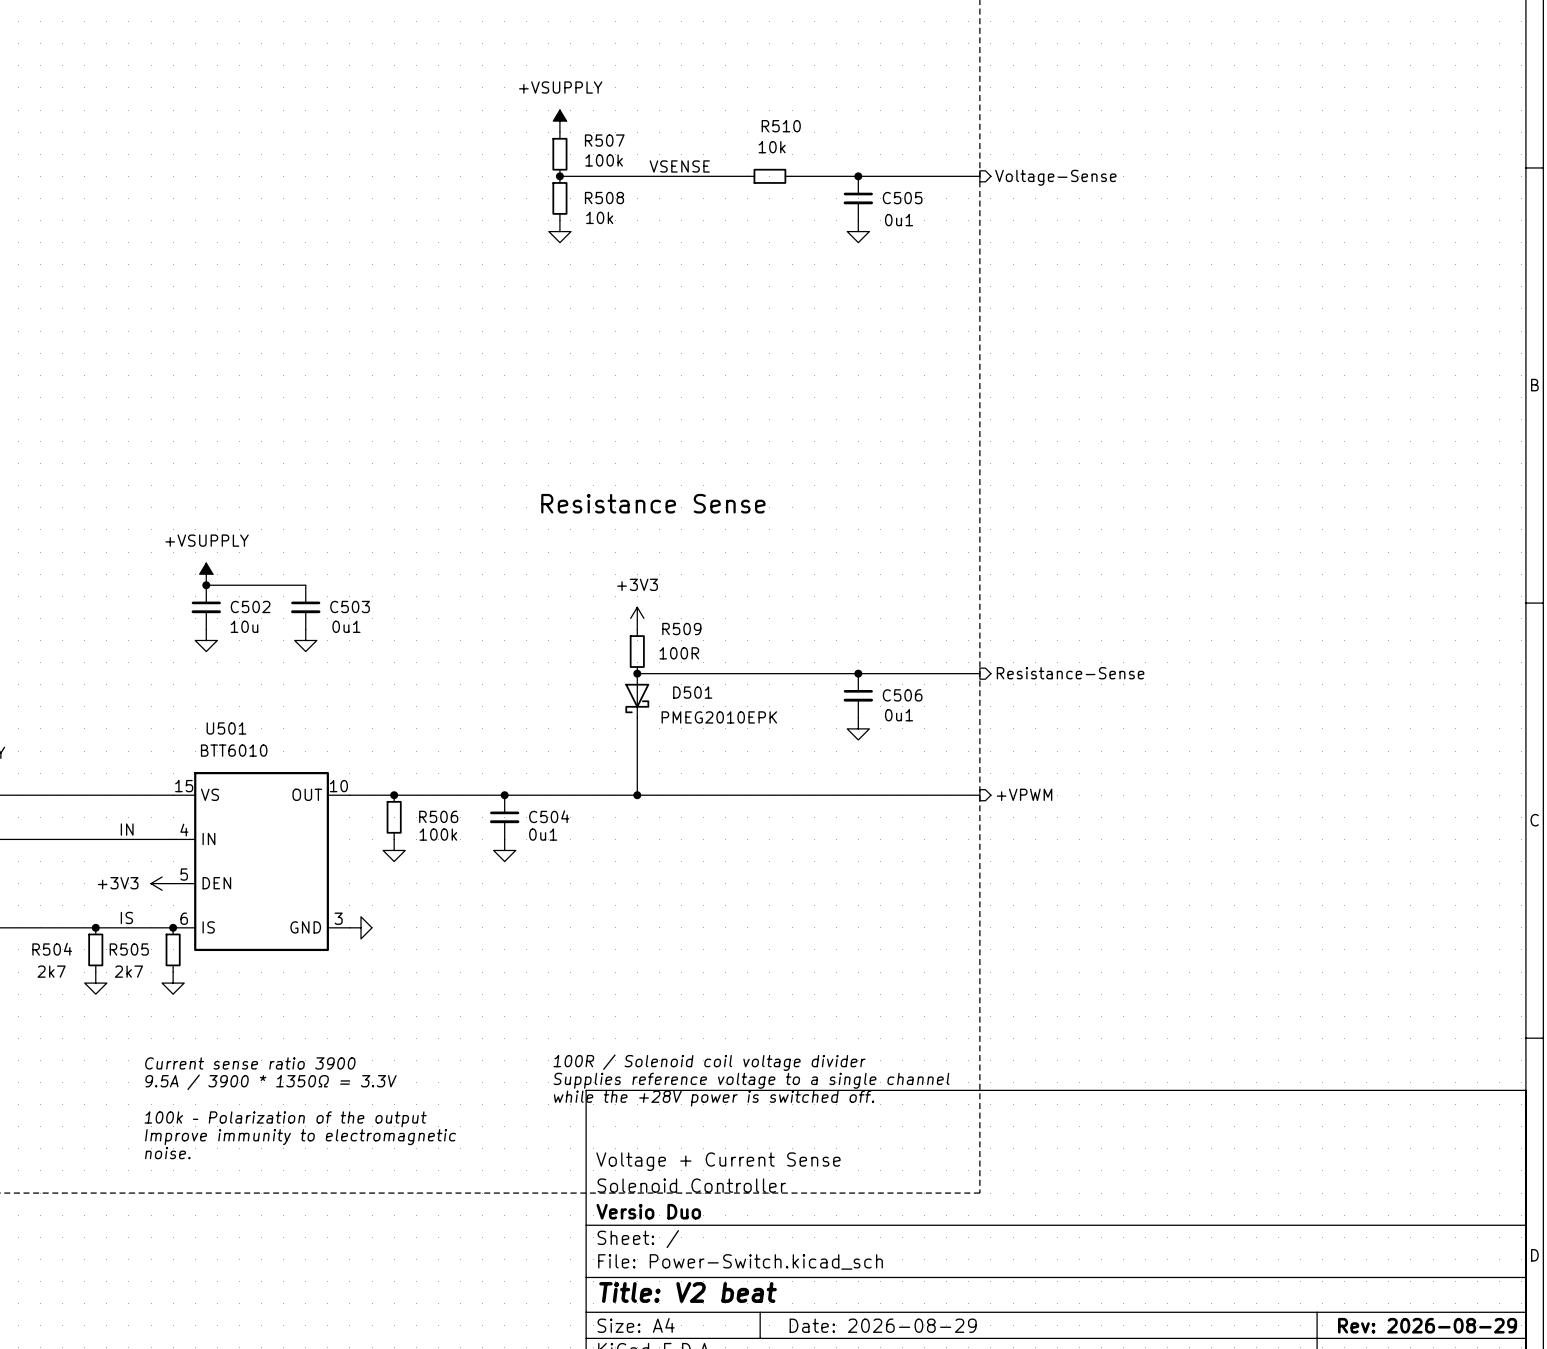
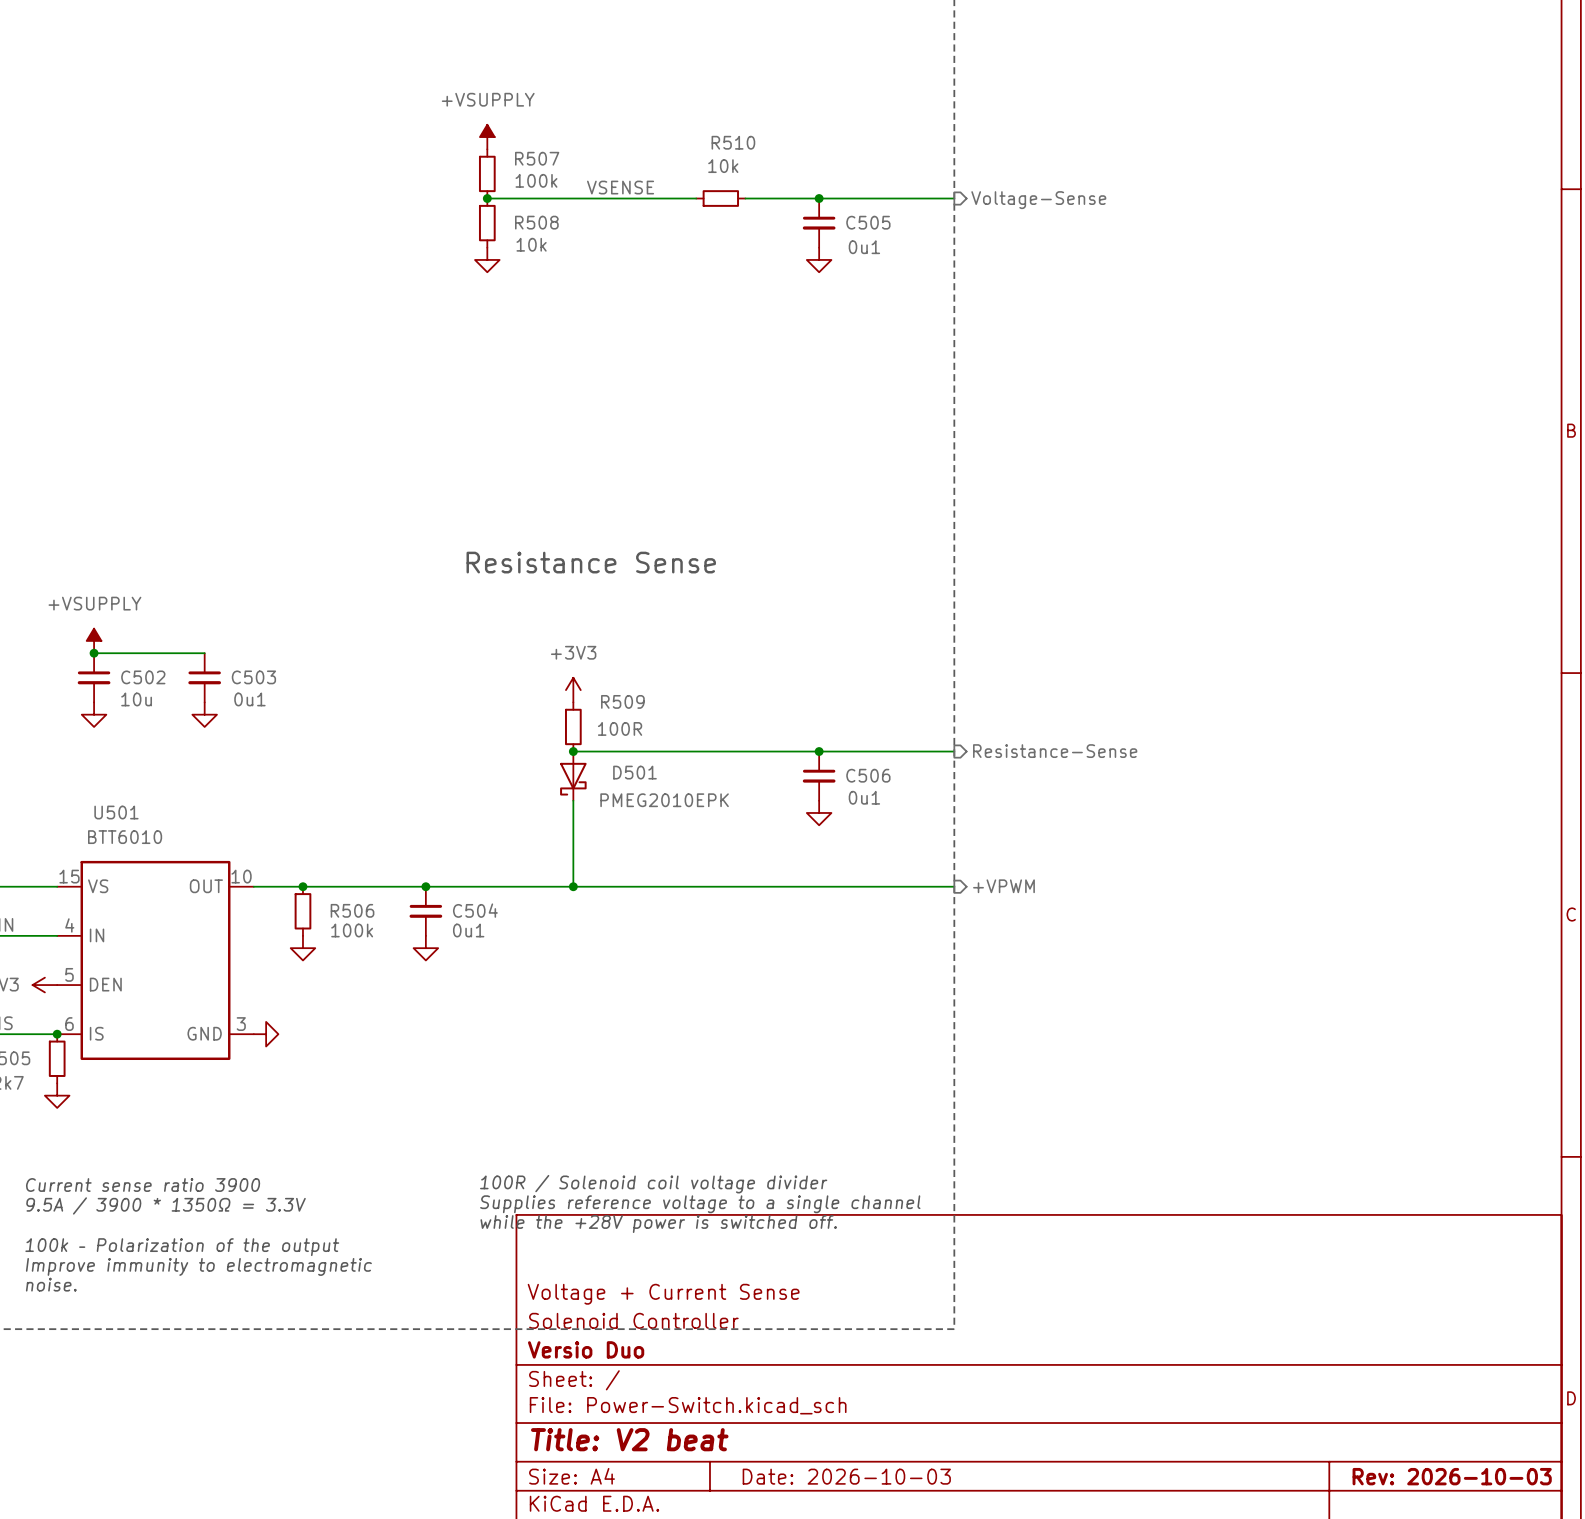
title block: Date: 2026-08-29 (883, 1325) -> Date: 2026-10-03 (846, 1476)
title block: Rev: 2026-08-29 (1427, 1325) -> Rev: 2026-10-03 (1452, 1476)

